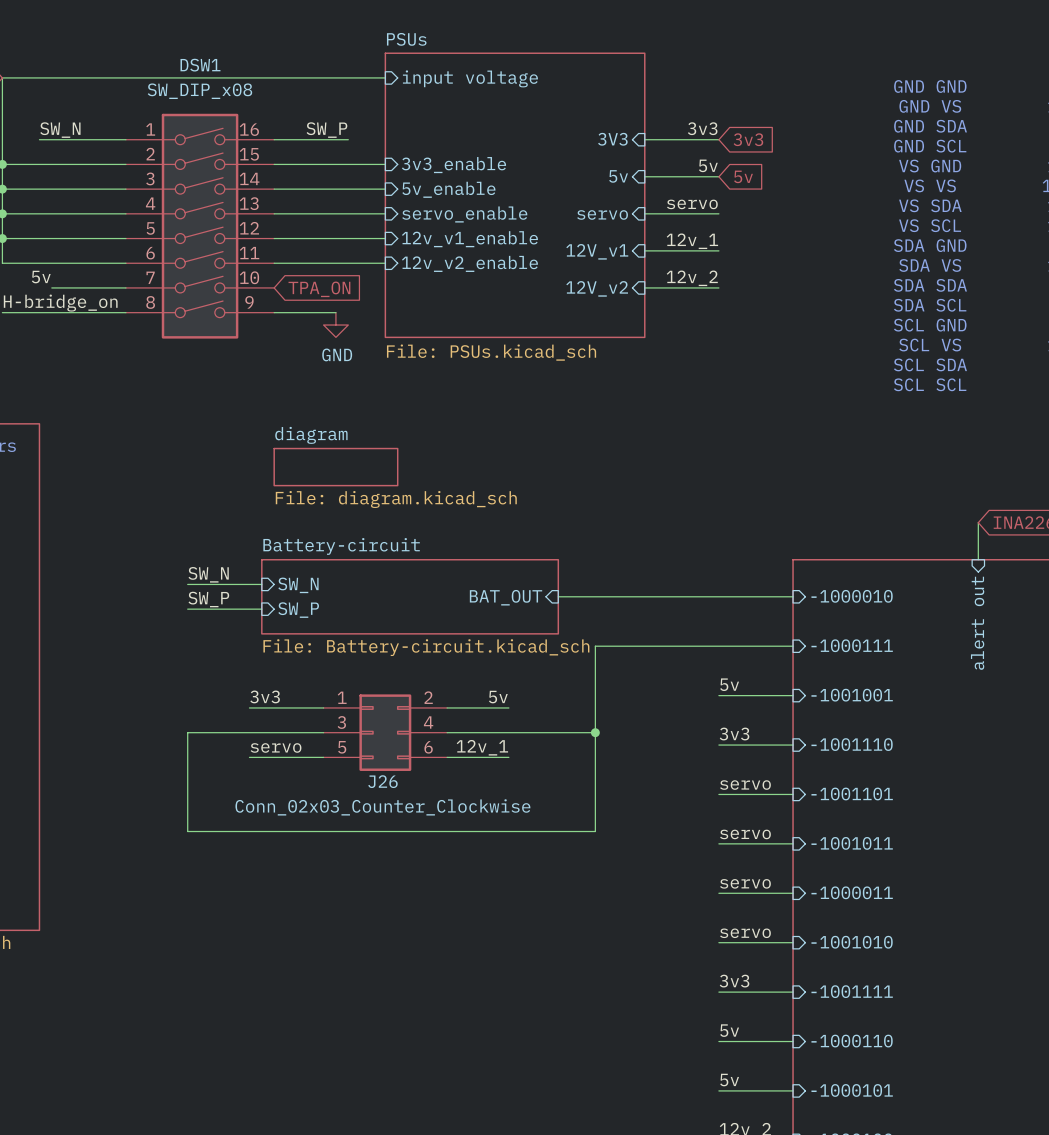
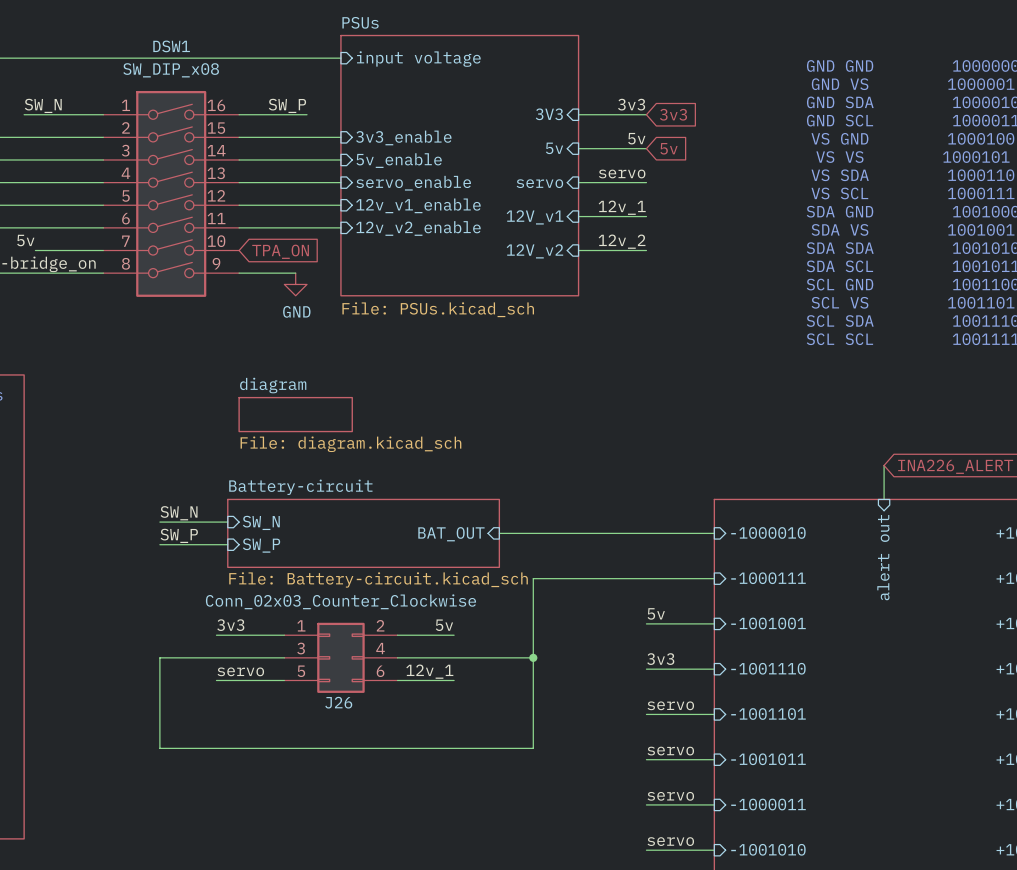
J26 value position: Conn_02x03_Counter_Clockwise (382, 807) -> Conn_02x03_Counter_Clockwise (340, 601)

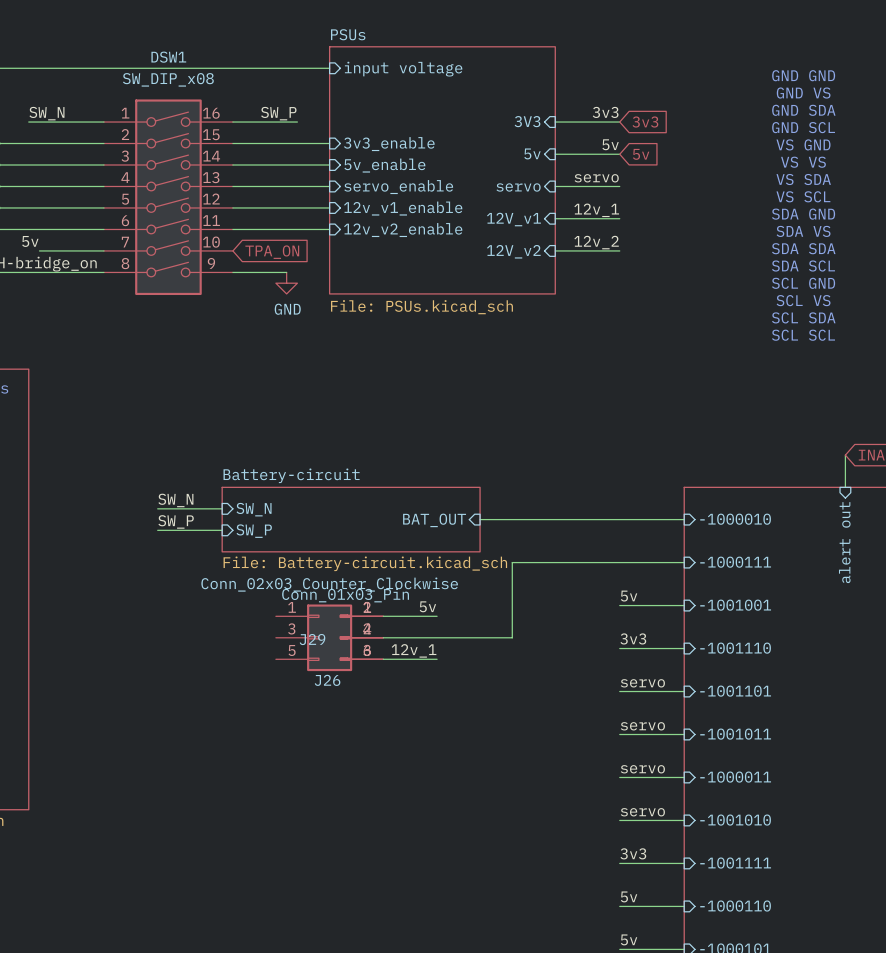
sheet diagram: File: diagram.kicad_sch (295, 414) -> none
label: 3v3 (230, 625) -> none
wire: (216, 635) (284, 635) -> none
wire: (284, 657) (159, 657) (159, 748) (533, 748) (533, 657) -> none
J29: none -> Conn_01x03_Pin (361, 637)
junction: (533, 657) -> none
label: servo (240, 671) -> none
wire: (216, 680) (284, 680) -> none

